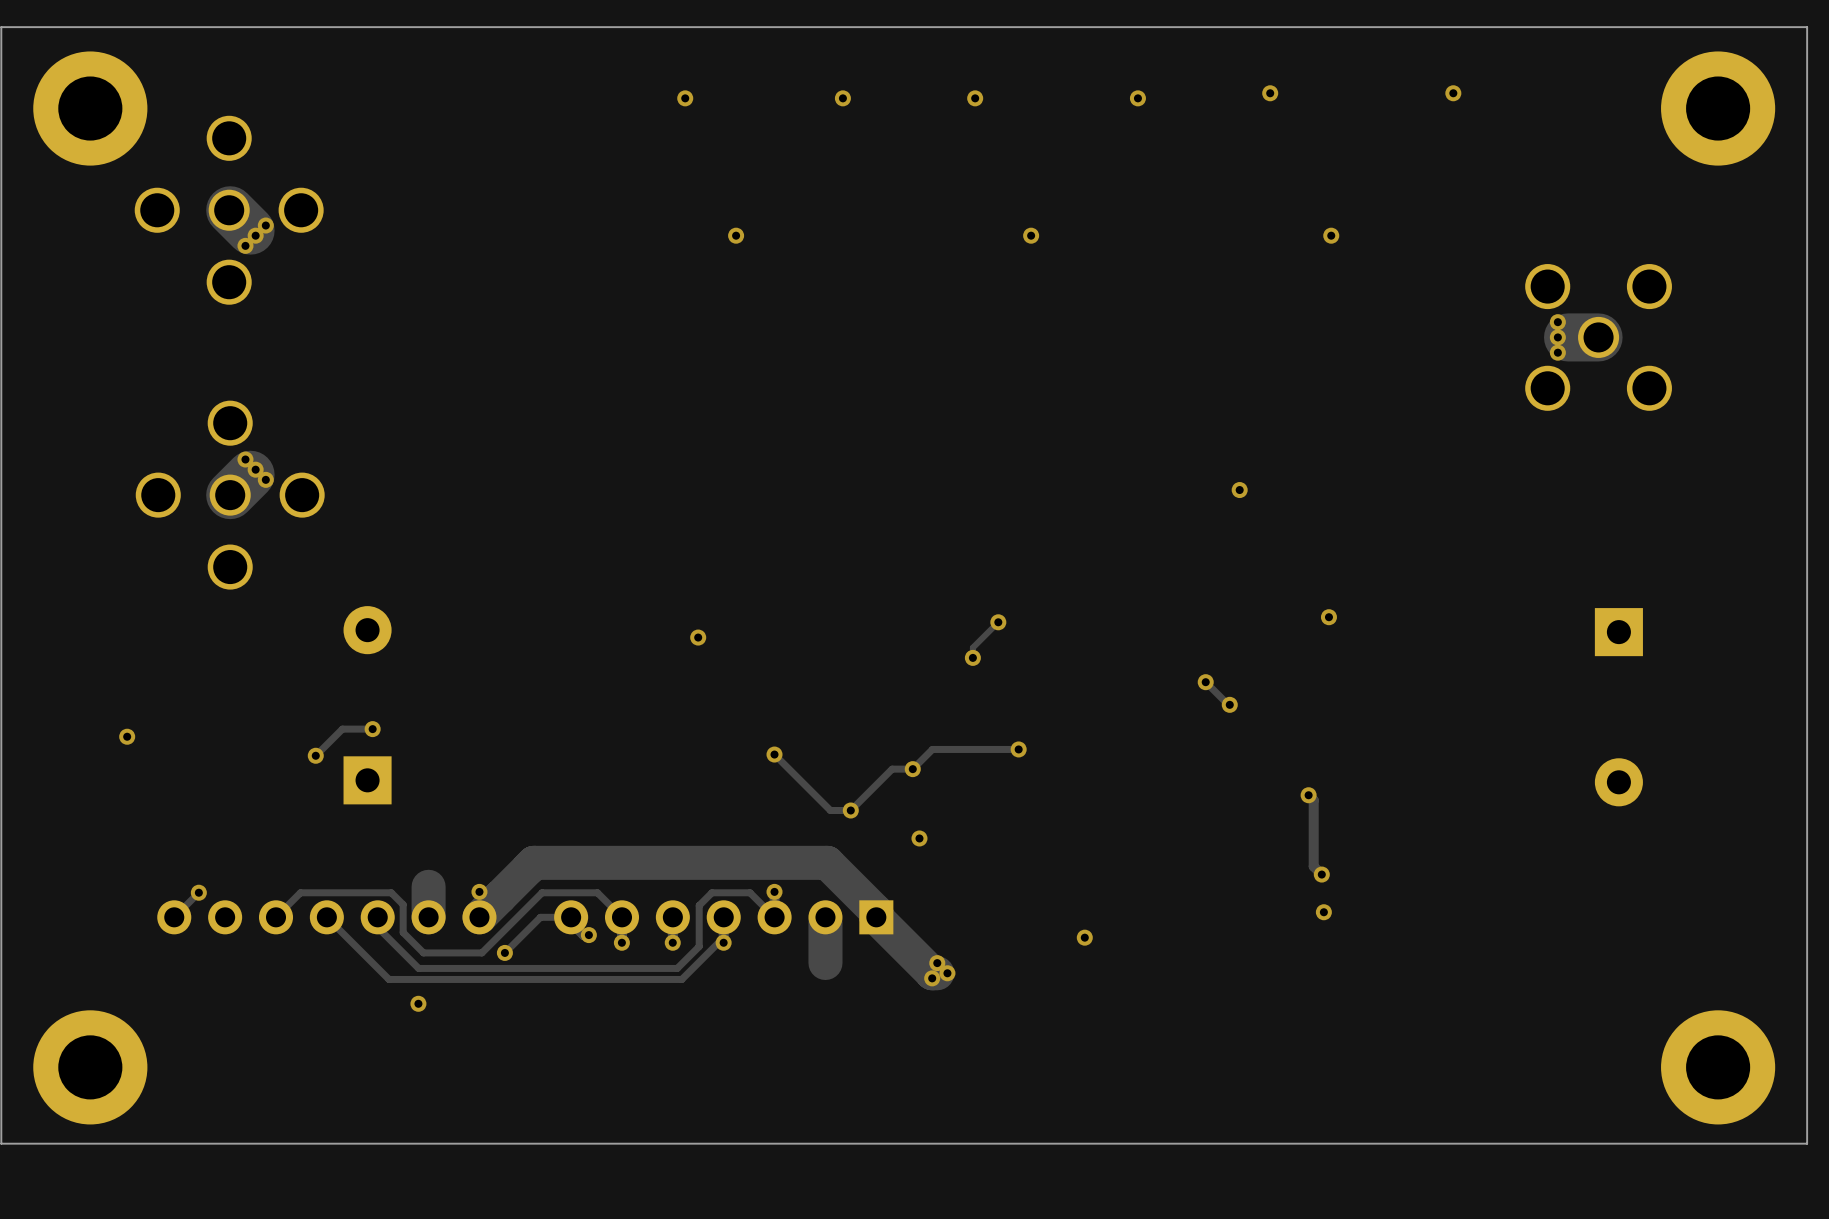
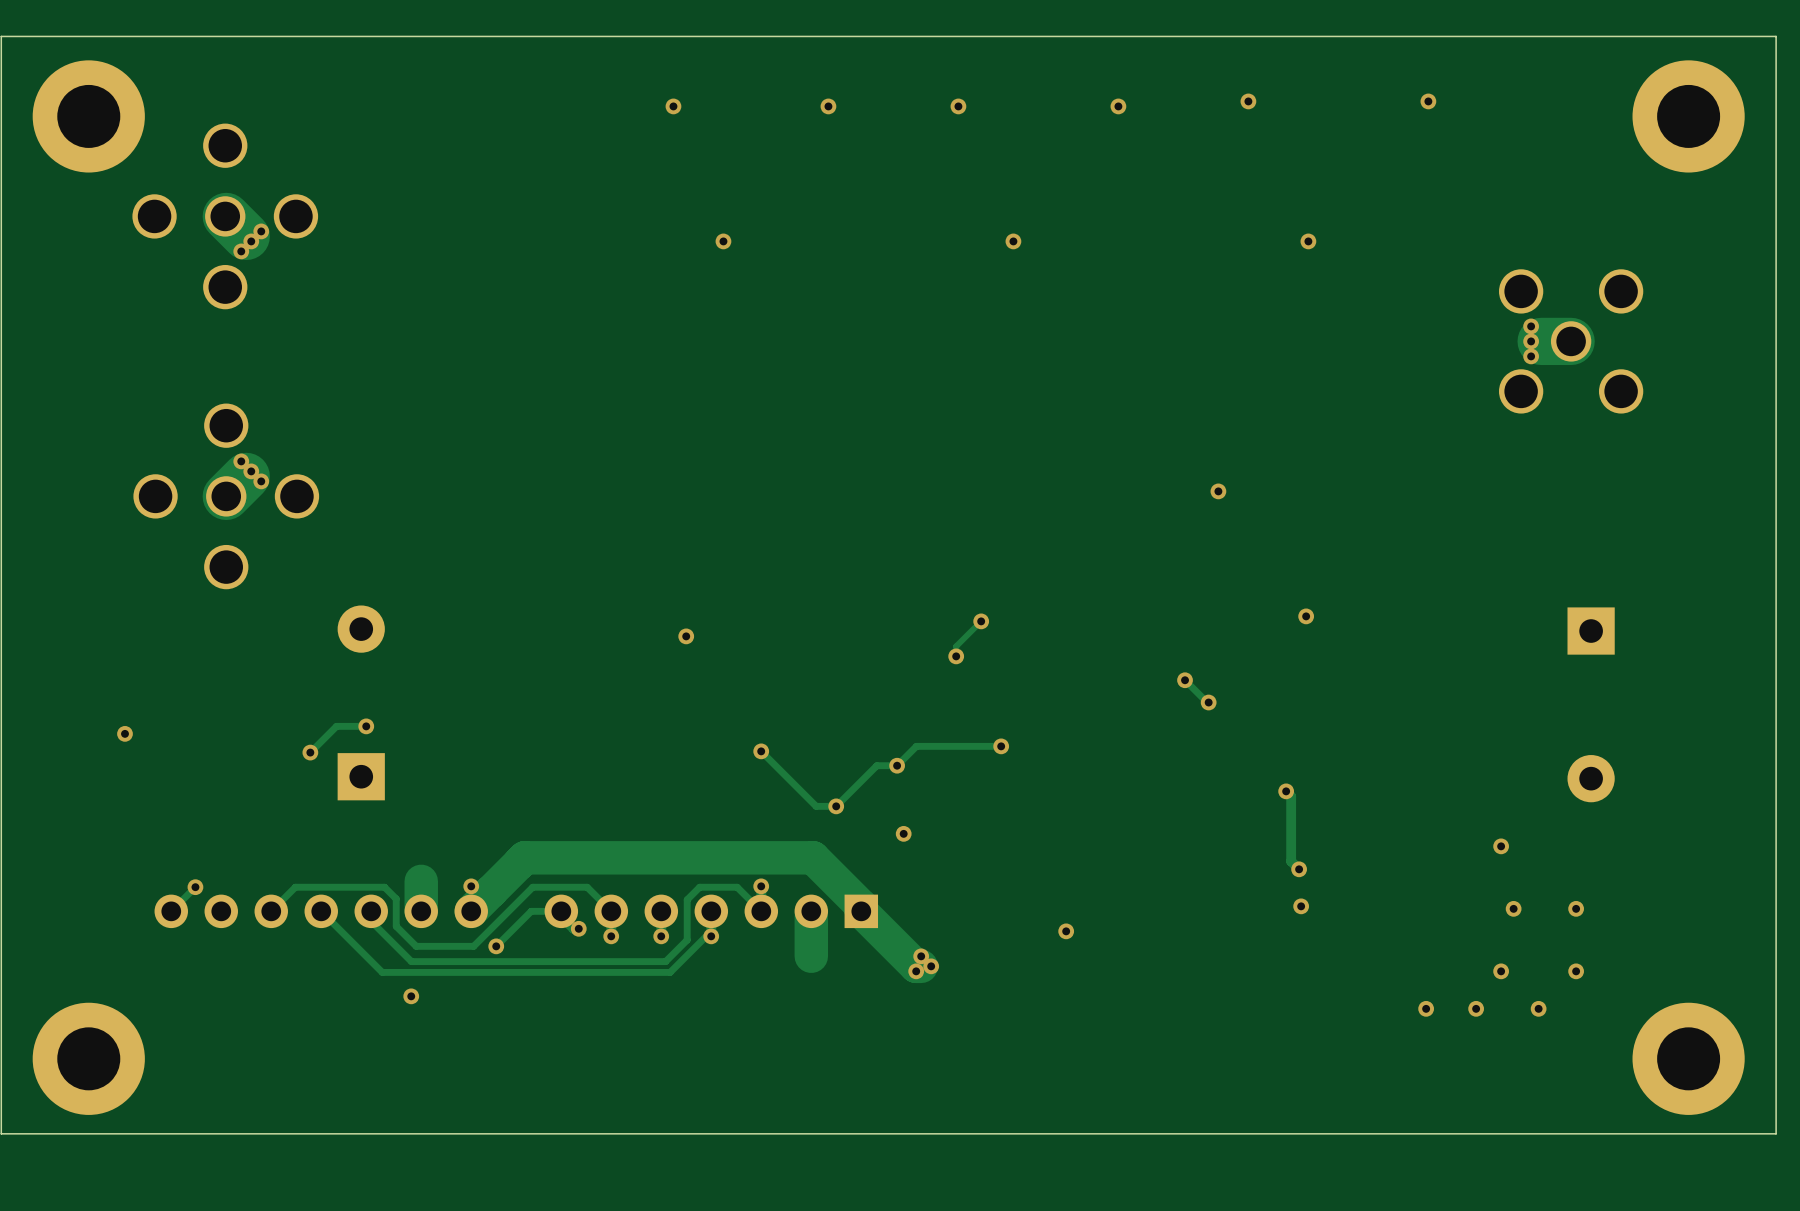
via: none -> (1501, 846)
via: none -> (1513, 908)
via: none -> (1576, 908)
via: none -> (1501, 971)
via: none -> (1576, 971)
via: none -> (1426, 1008)
via: none -> (1476, 1008)
via: none -> (1538, 1008)

